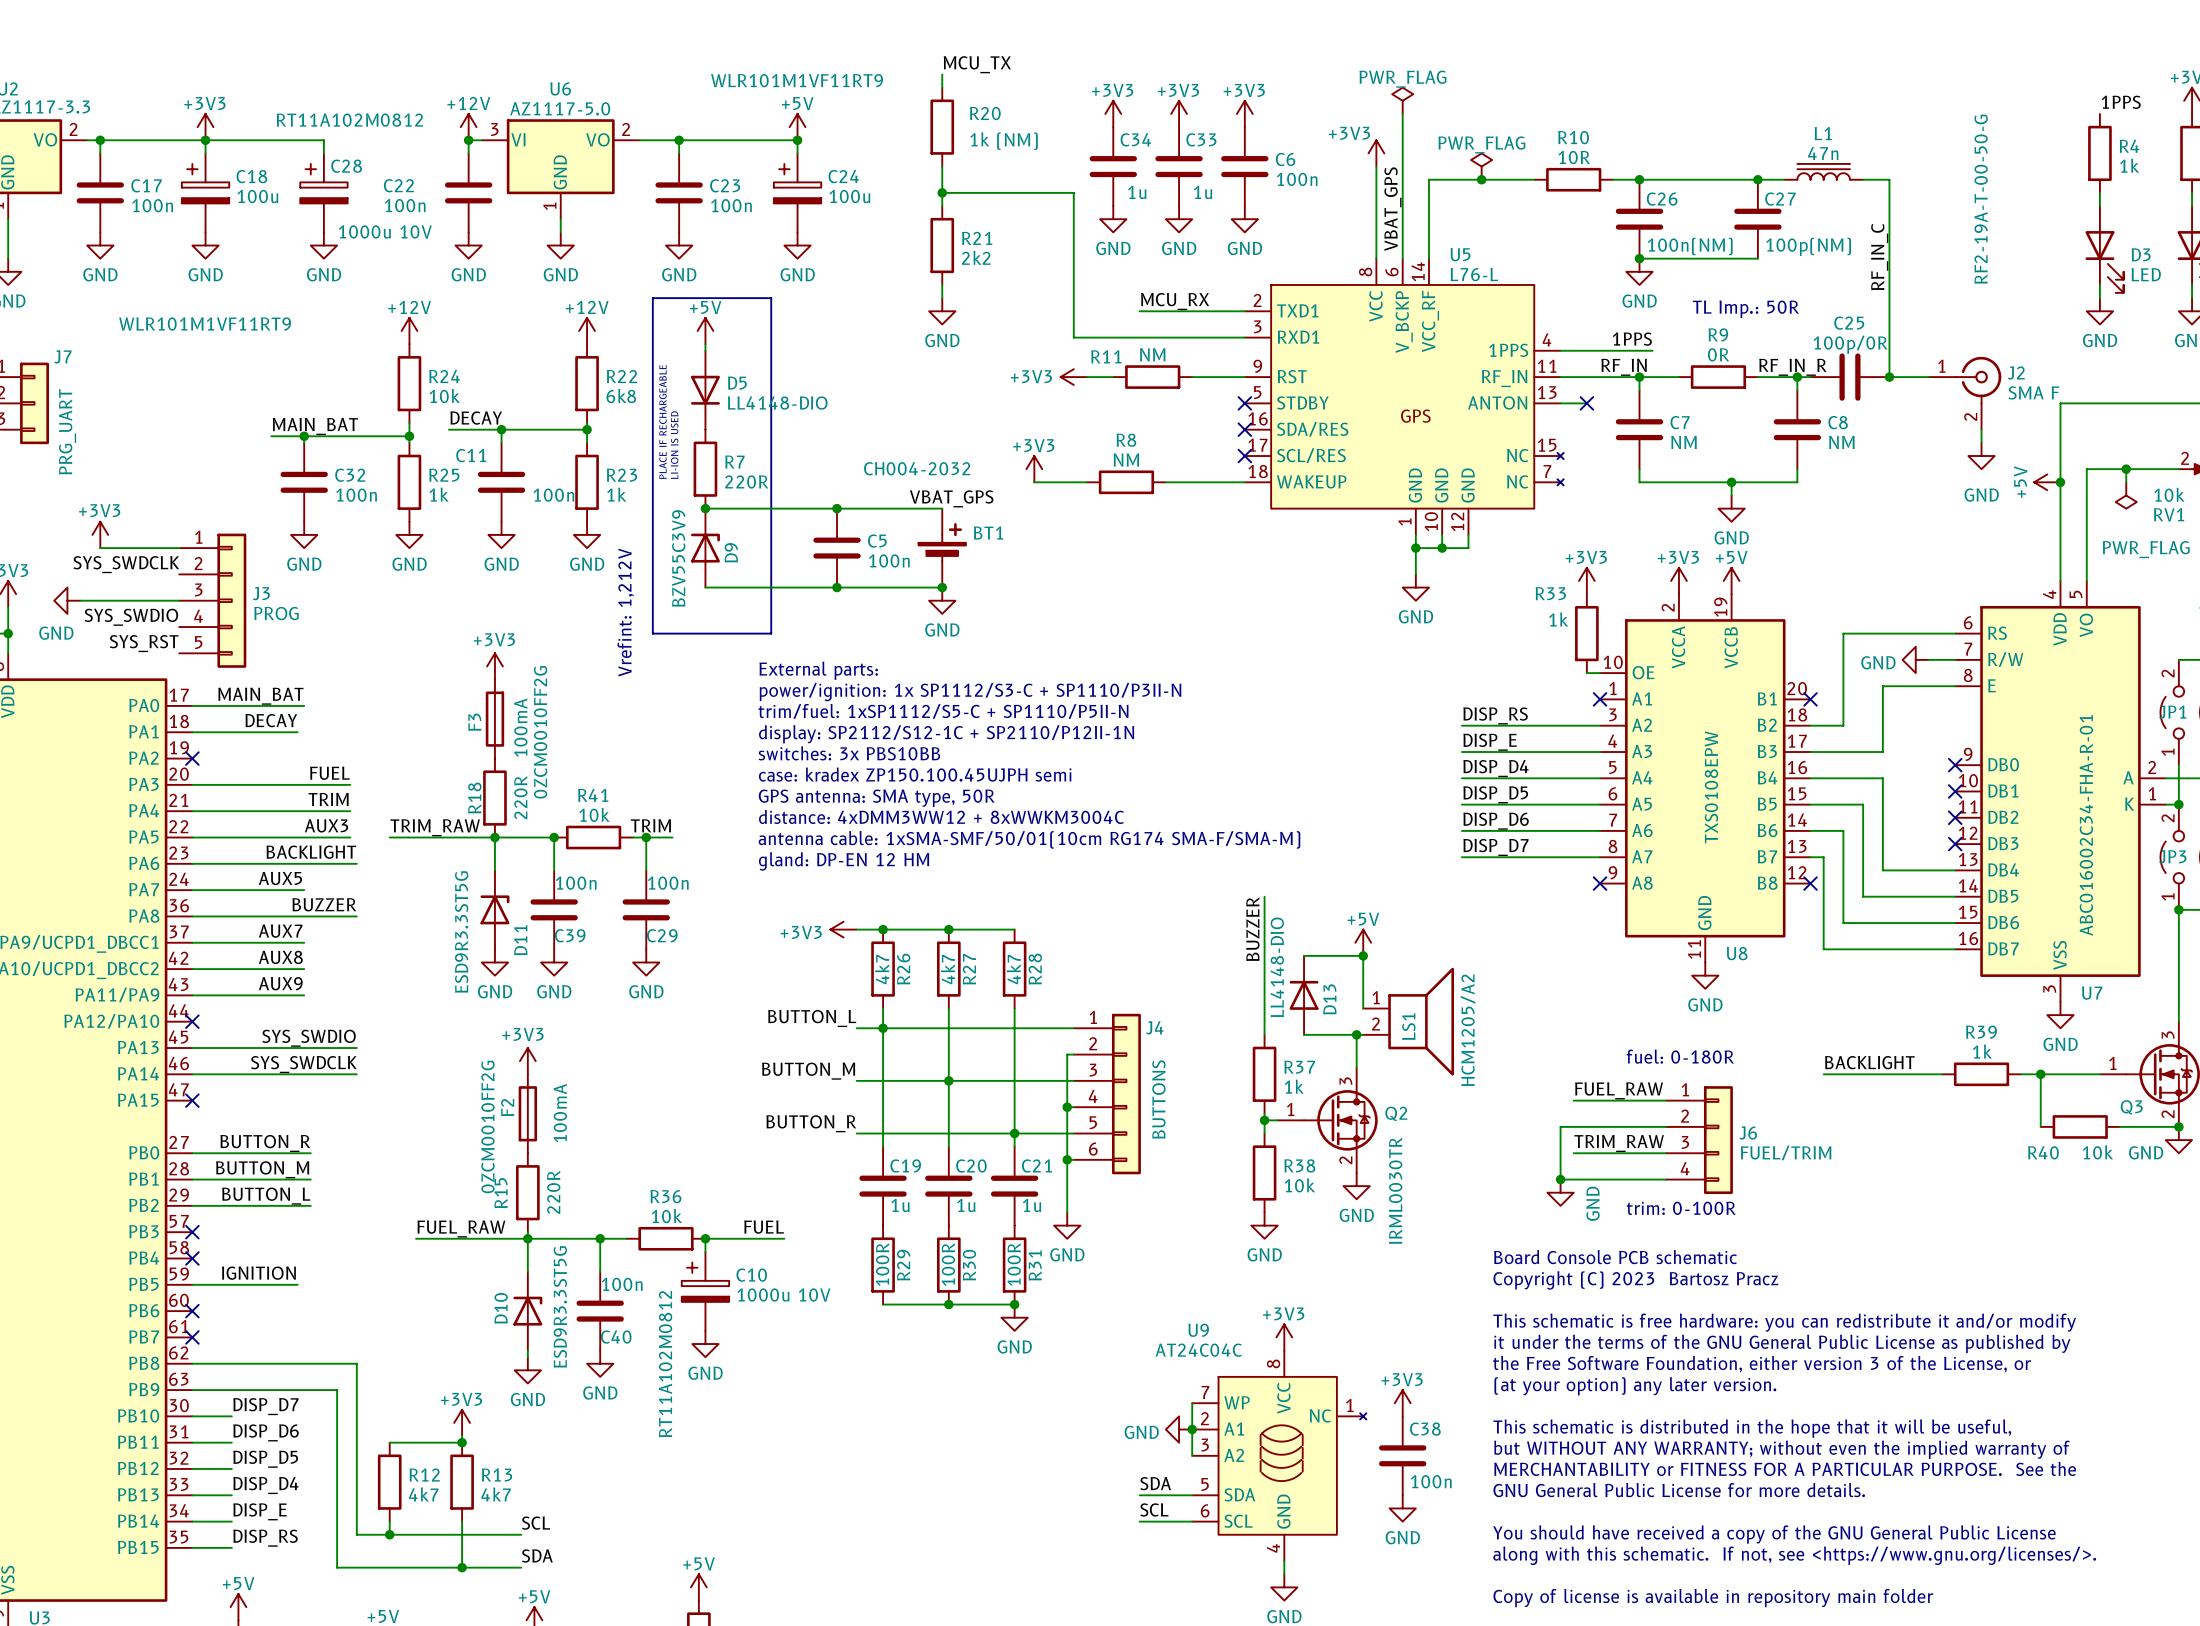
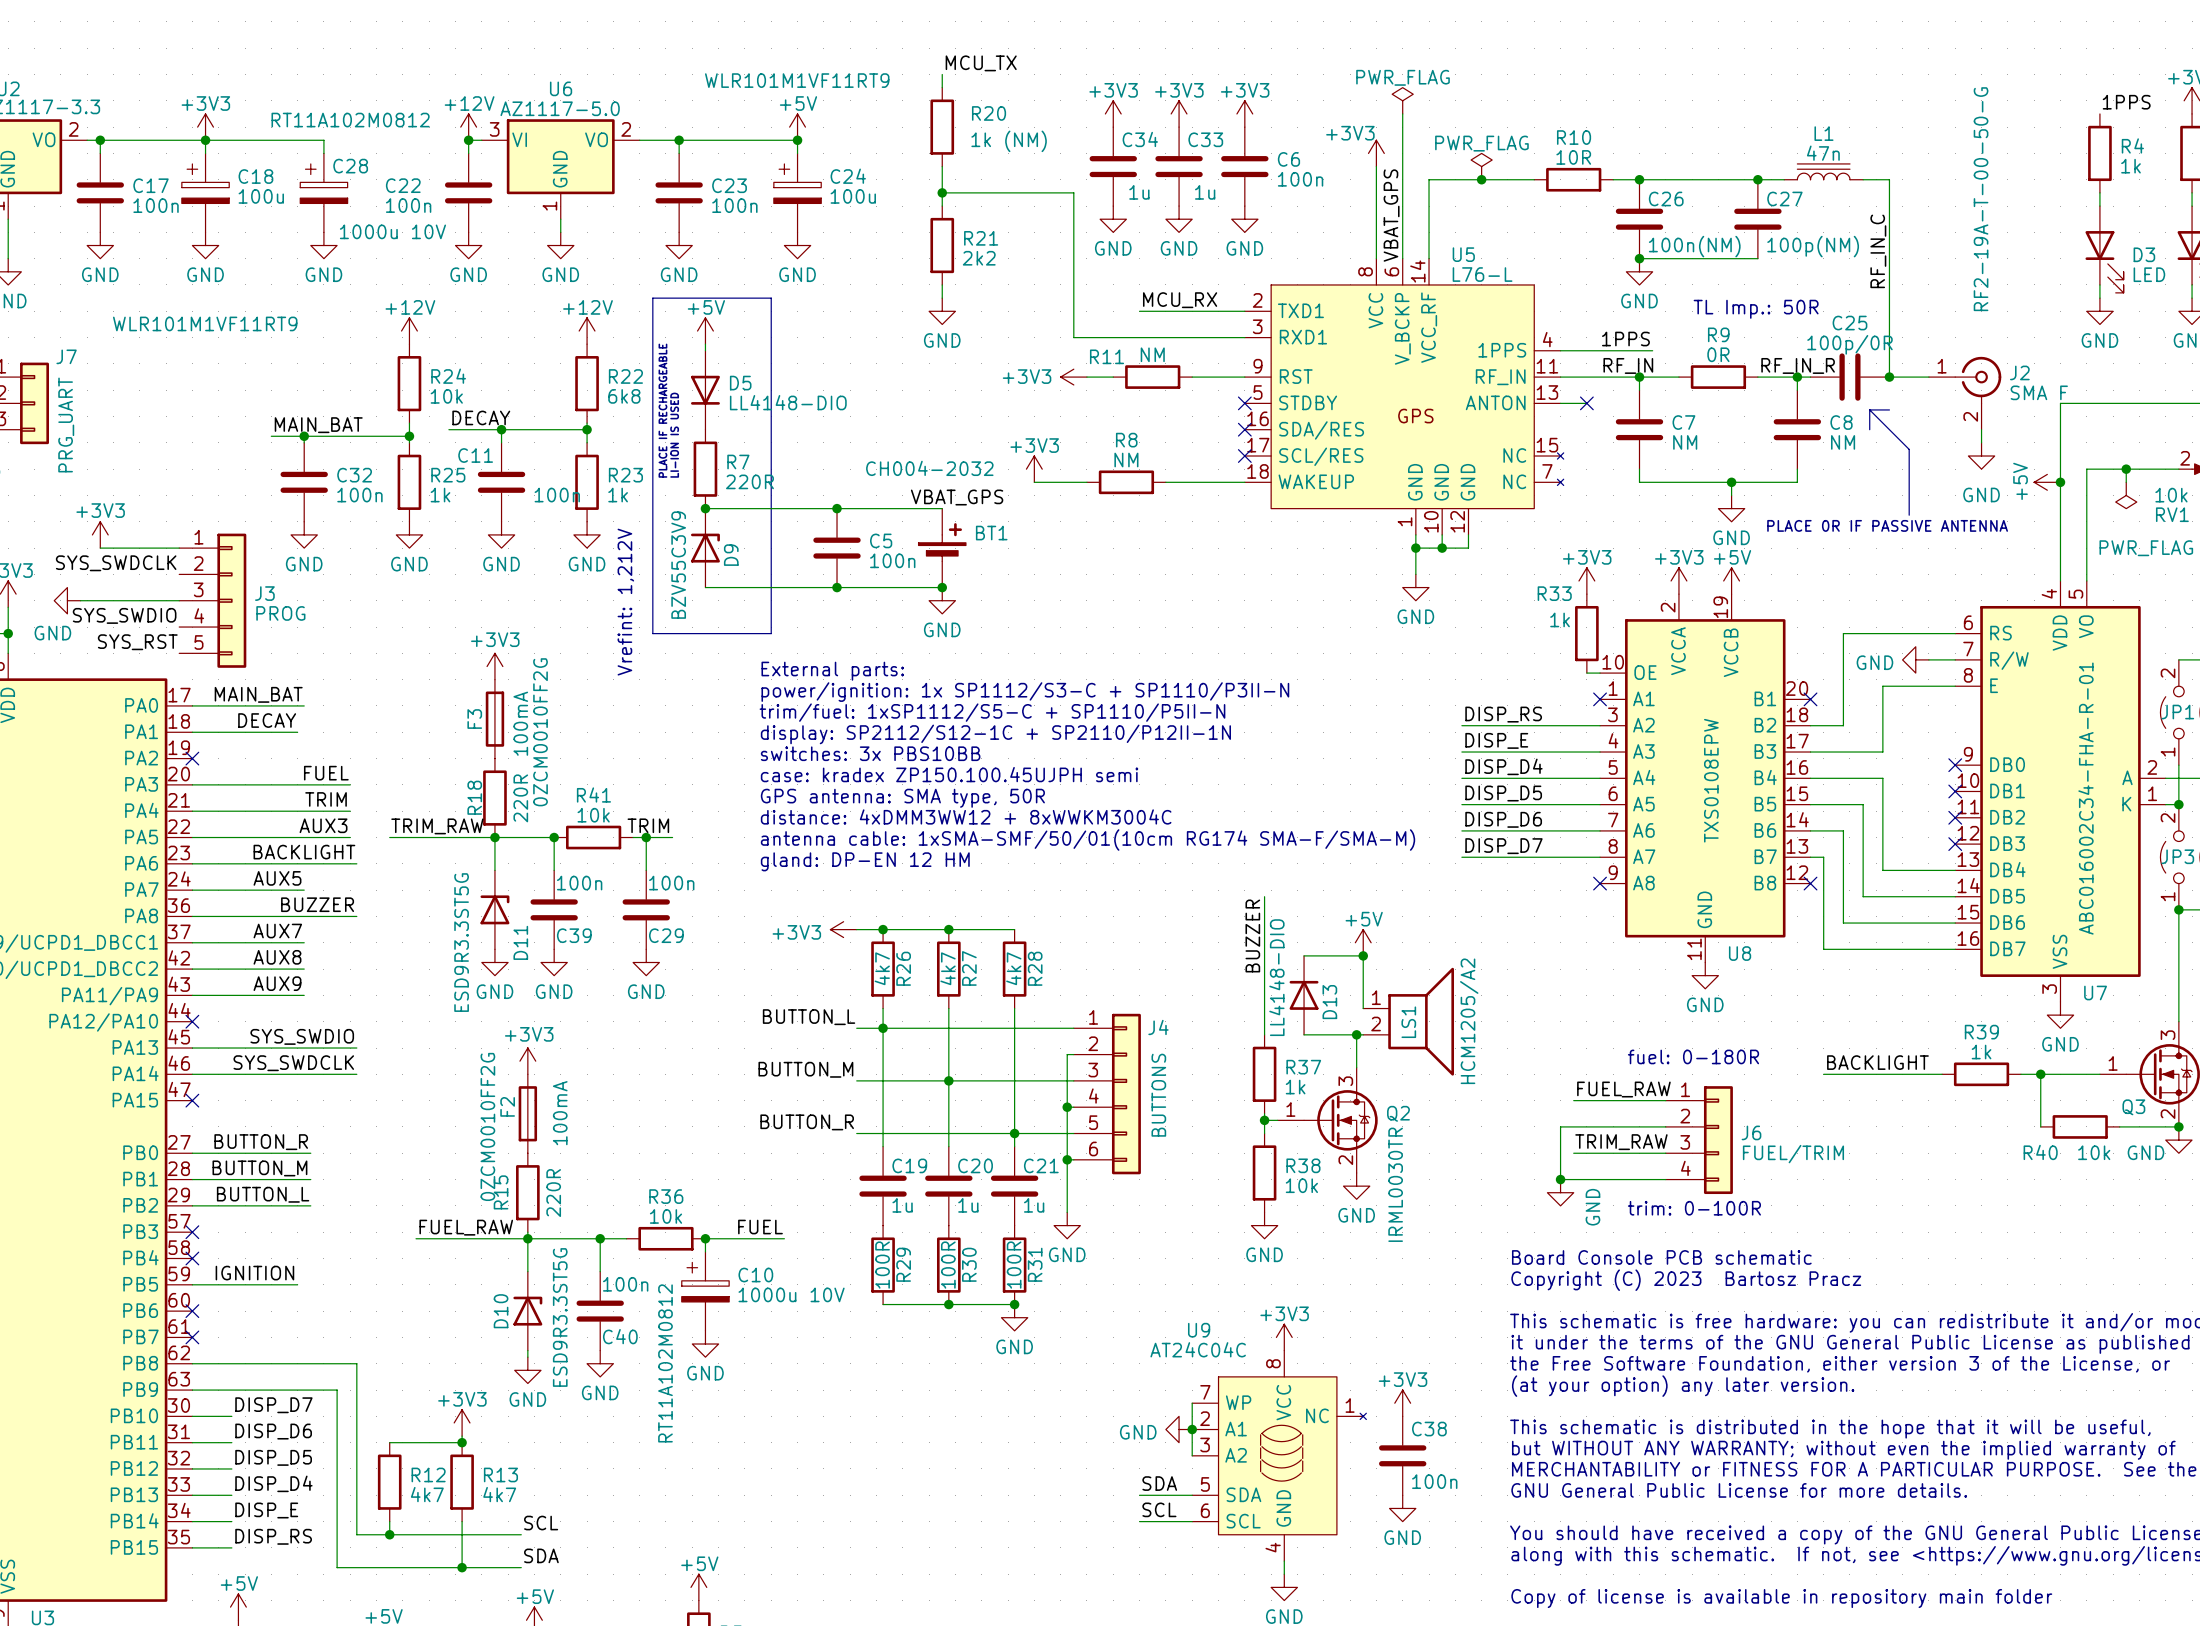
line: none -> (1869, 409) (1869, 429)
line: none -> (1869, 409) (1909, 449) (1909, 515)
line: none -> (1869, 409) (1889, 409)
text: none -> PLACE 0R IF PASSIVE ANTENNA (1887, 525)

